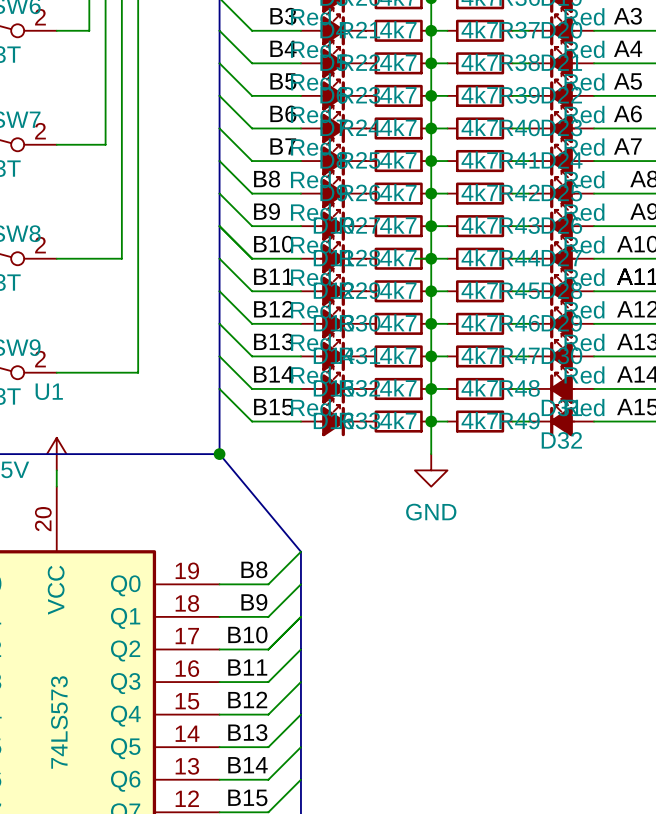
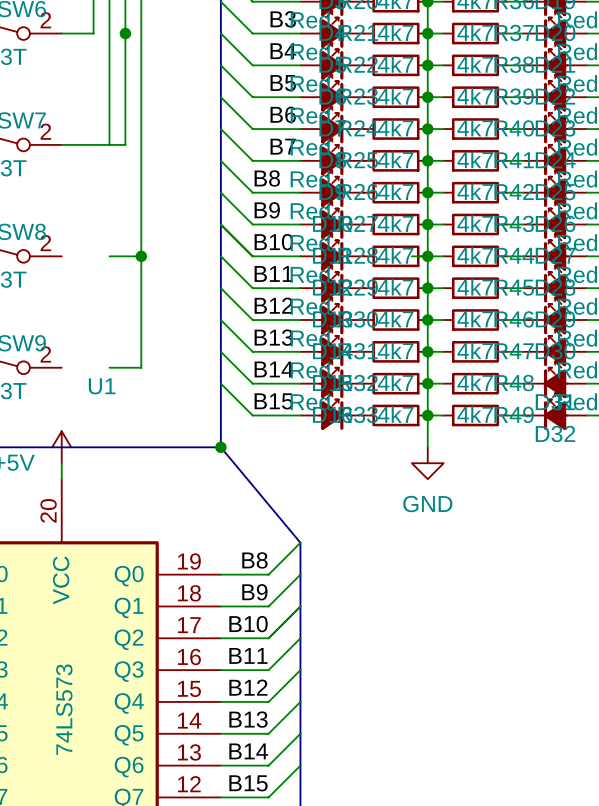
junction: none -> (125, 33)
wire: (121, 144) (121, 258) -> (125, 144) (109, 144)
wire: (56, 258) (105, 258) -> none
wire: none -> (125, 256) (141, 256)
junction: none -> (141, 256)
wire: (56, 372) (105, 372) -> none
U1 name position: U1 (49, 391) -> U1 (102, 386)

